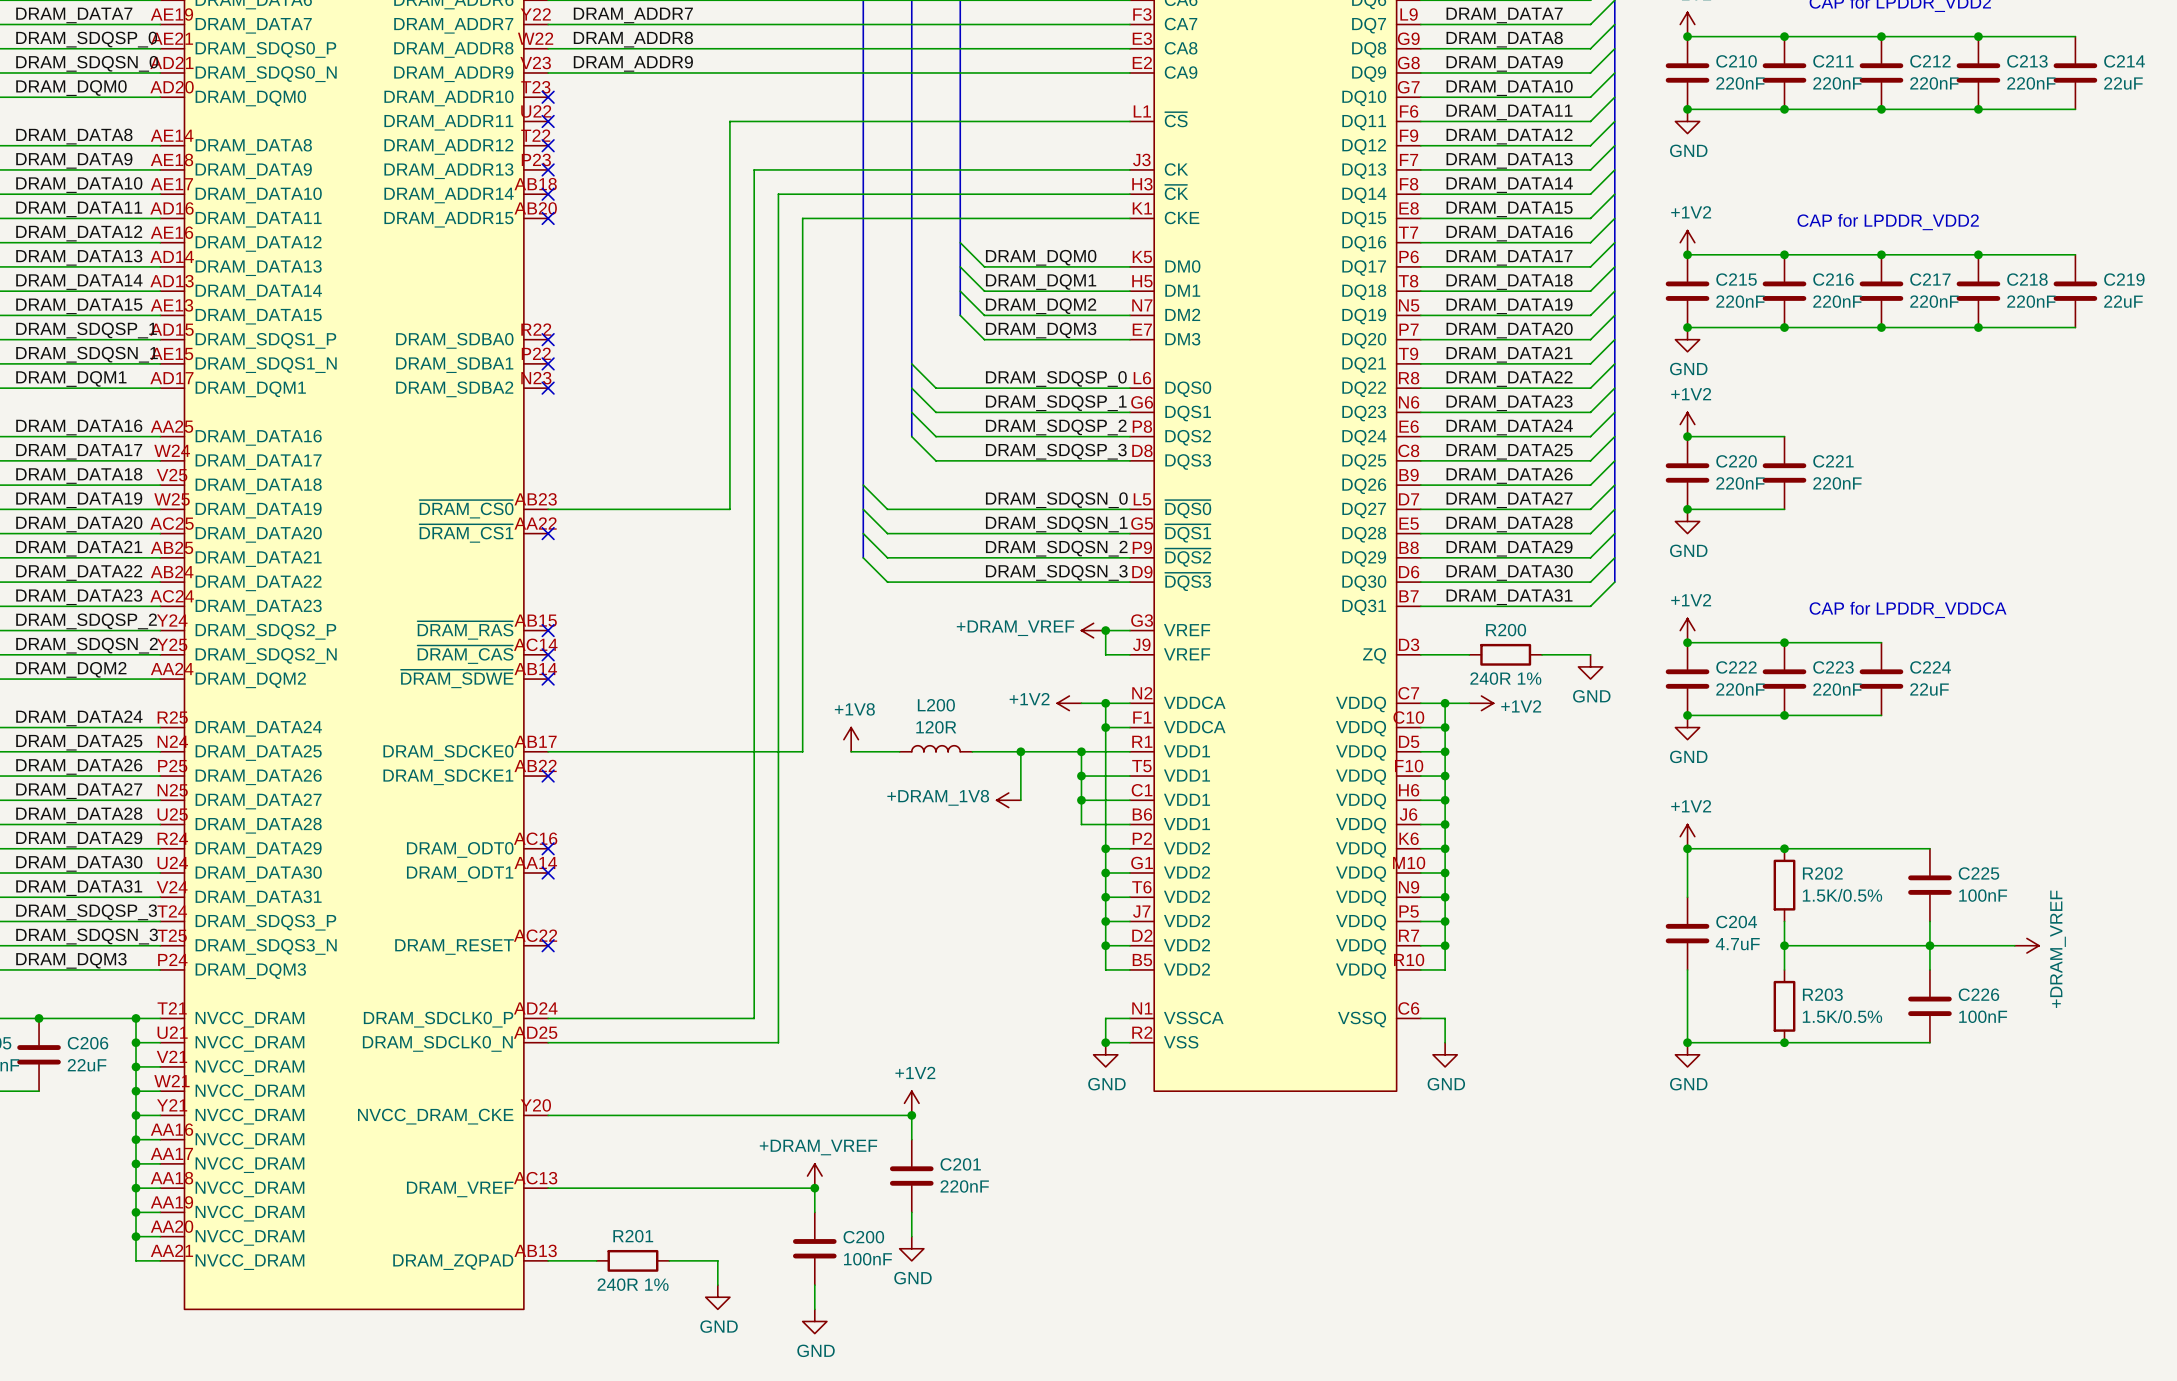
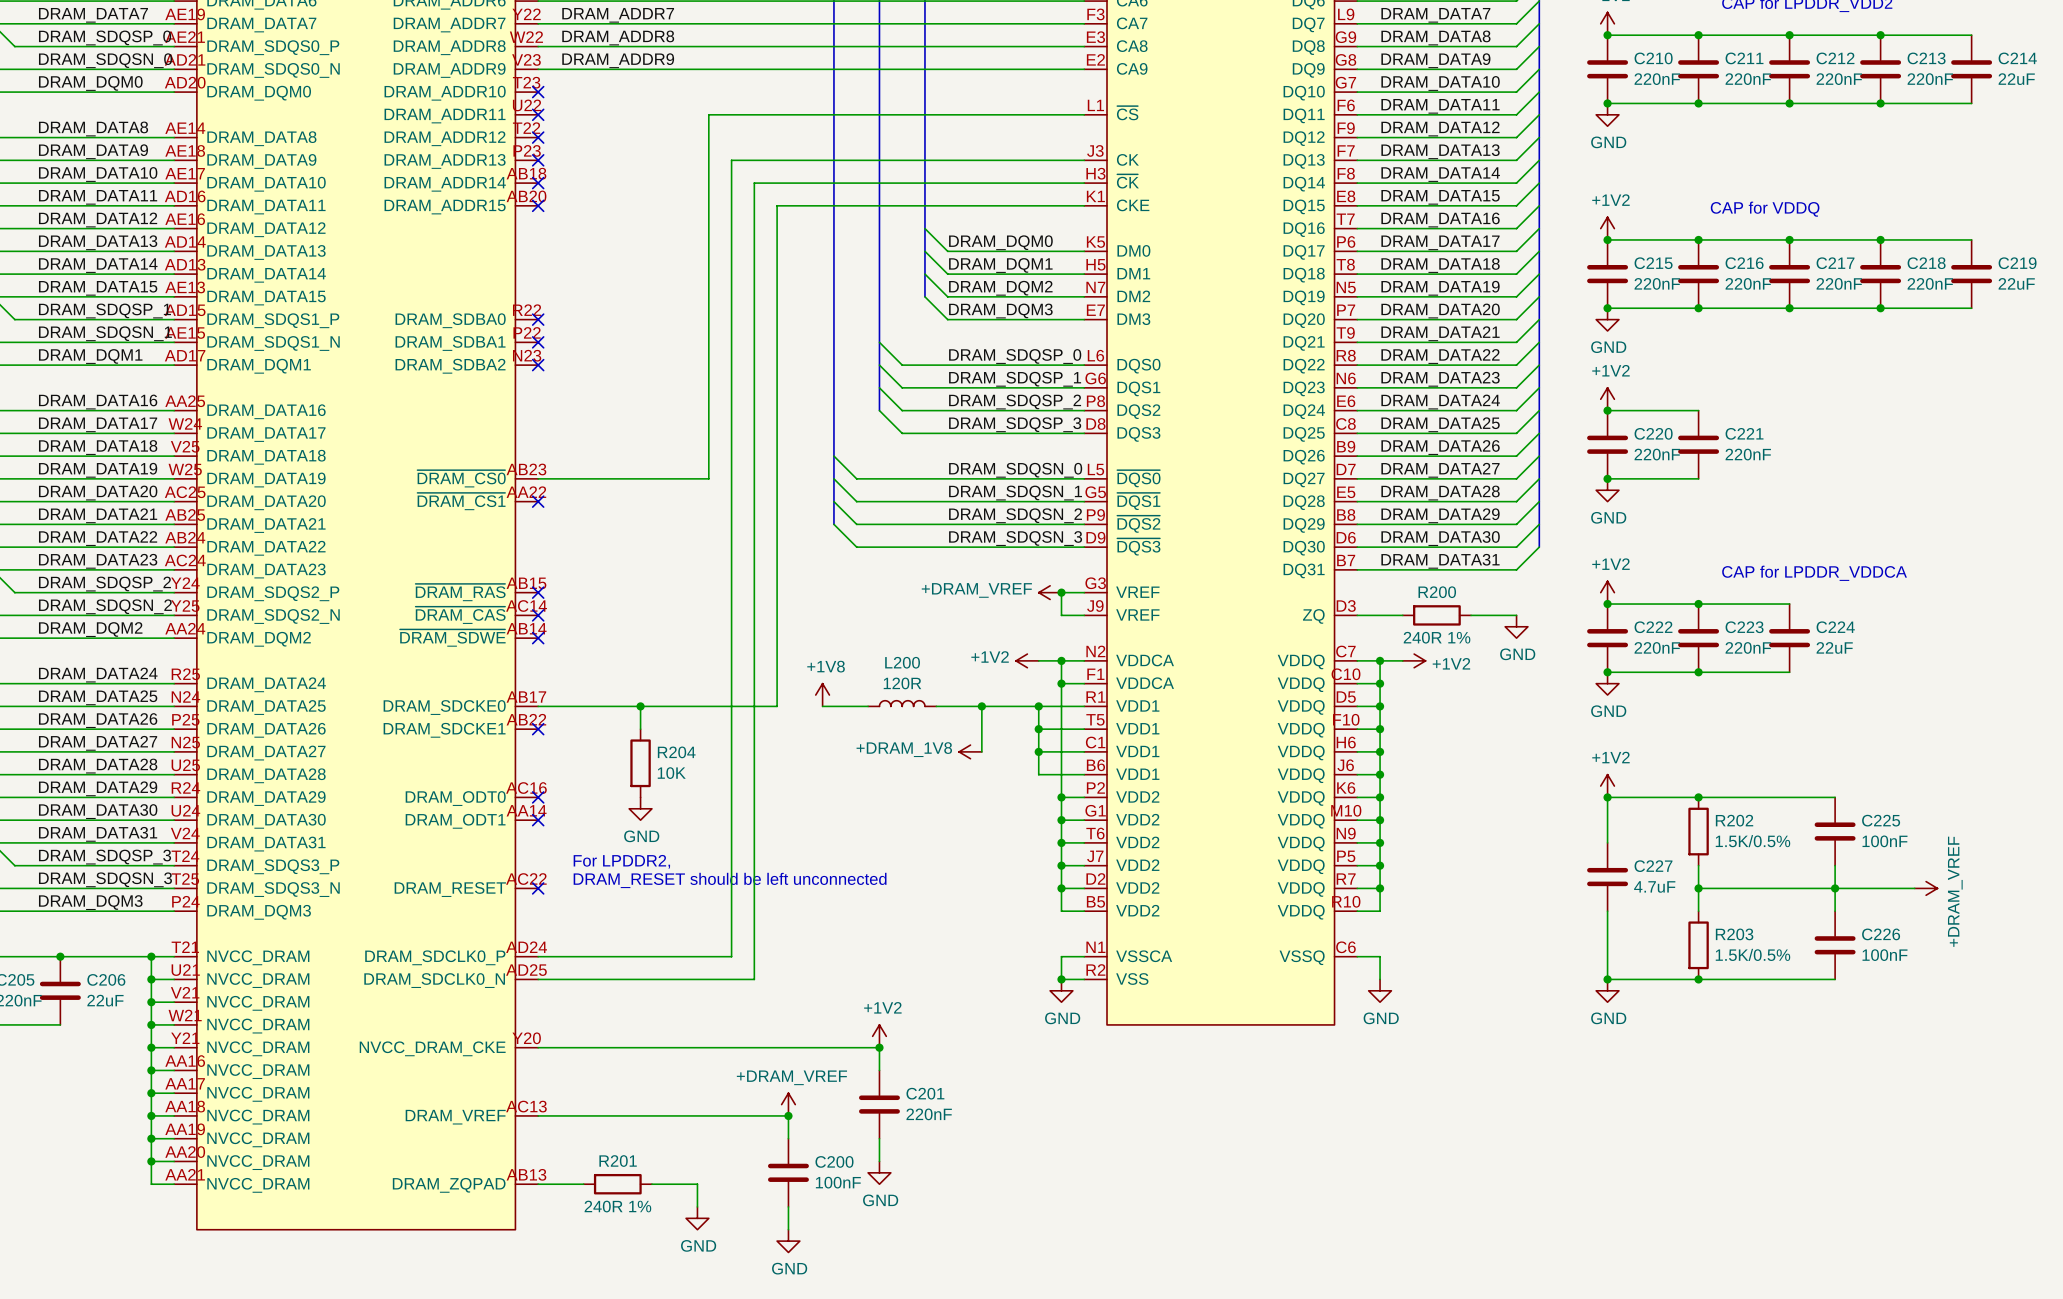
text: CAP for LPDDR_VDD2 (1888, 222) -> CAP for VDDQ (1765, 209)
wire: none -> (640, 706) (640, 729)
junction: none -> (640, 706)
R204: none -> 10K (640, 763)
power symbol: none -> GND (640, 808)
text: none -> For LPDDR2, (621, 861)
C204 name: C204 (1736, 921) -> C227 (1653, 866)
text: none -> DRAM_RESET should be left unconnected (730, 880)

